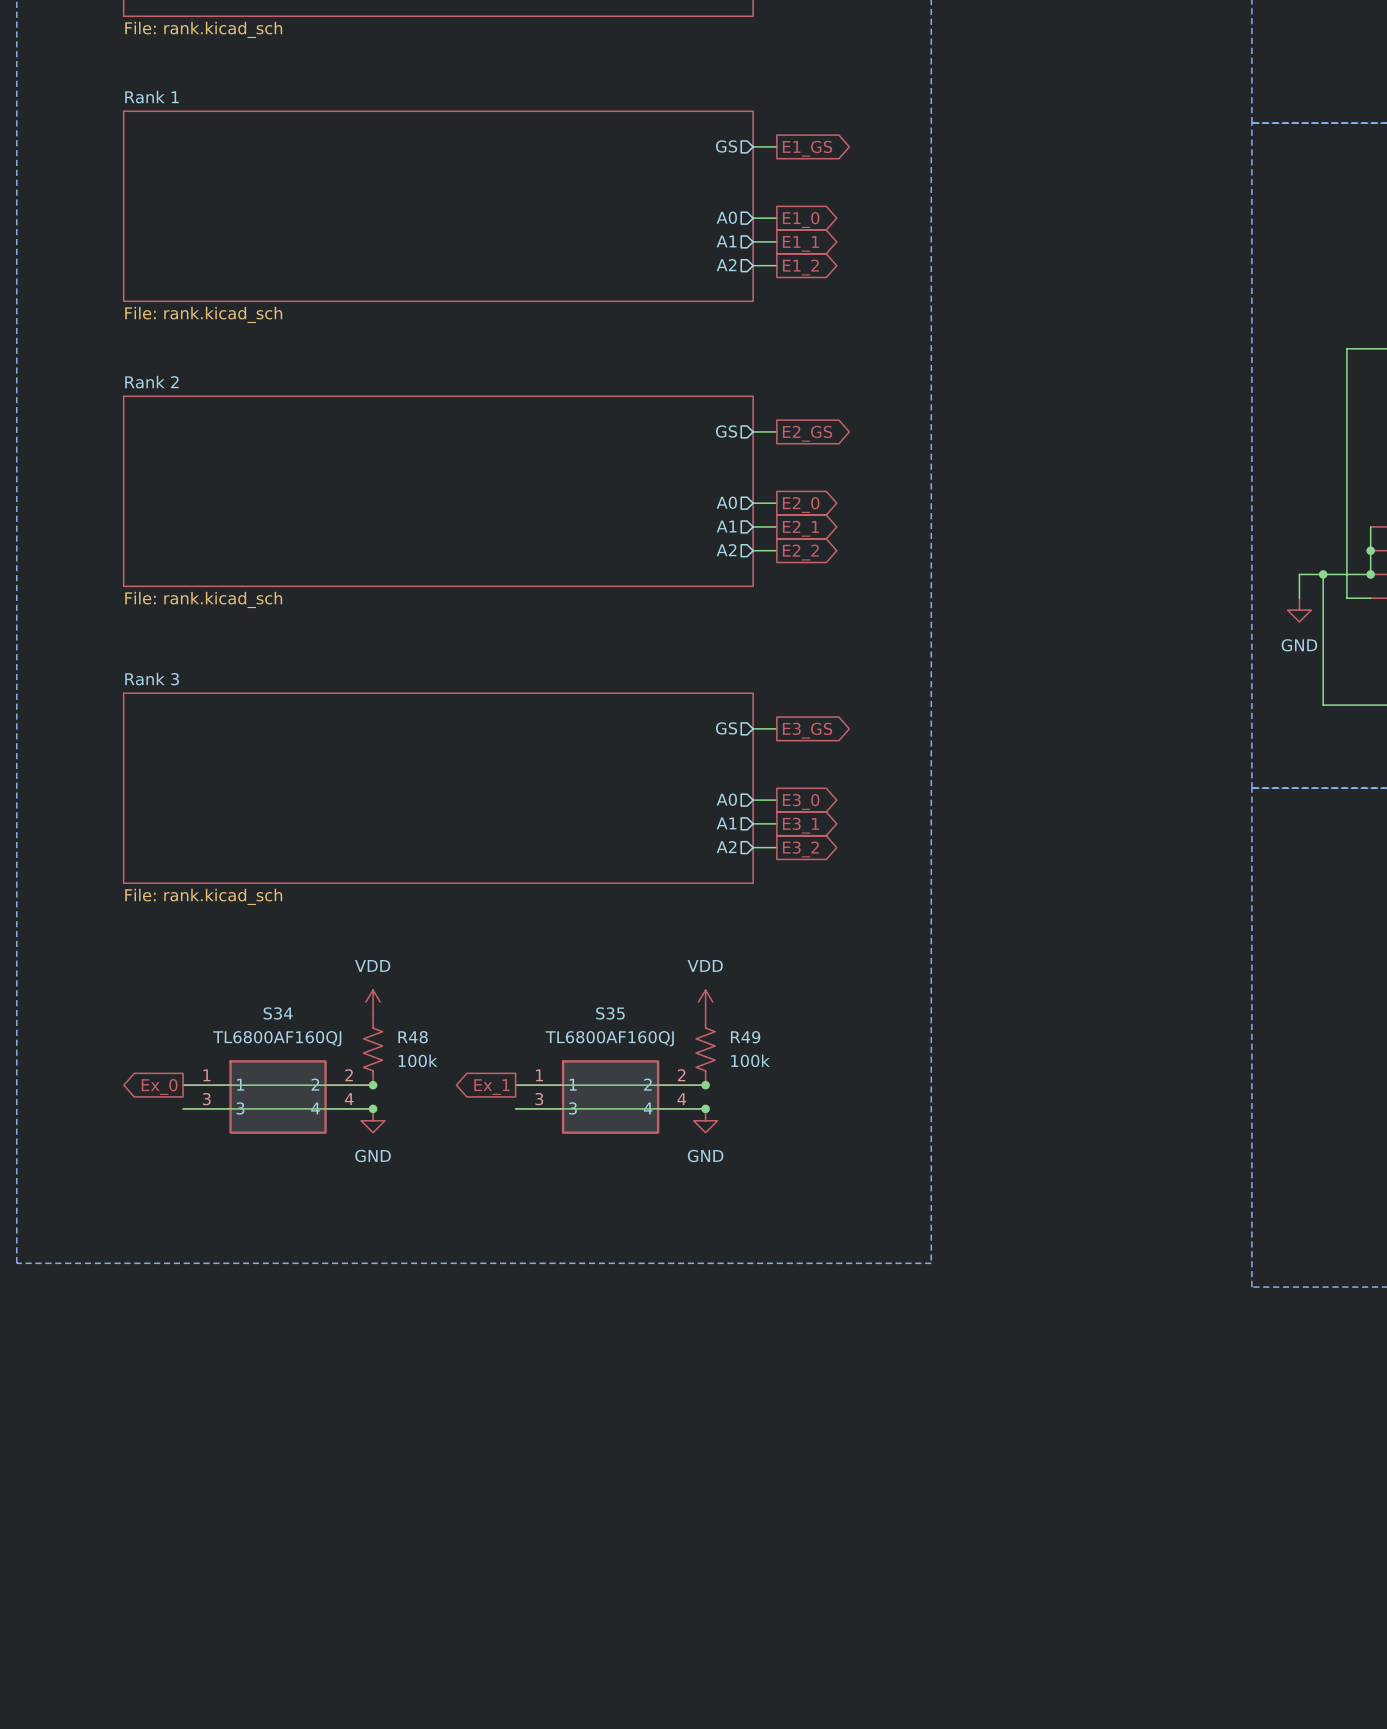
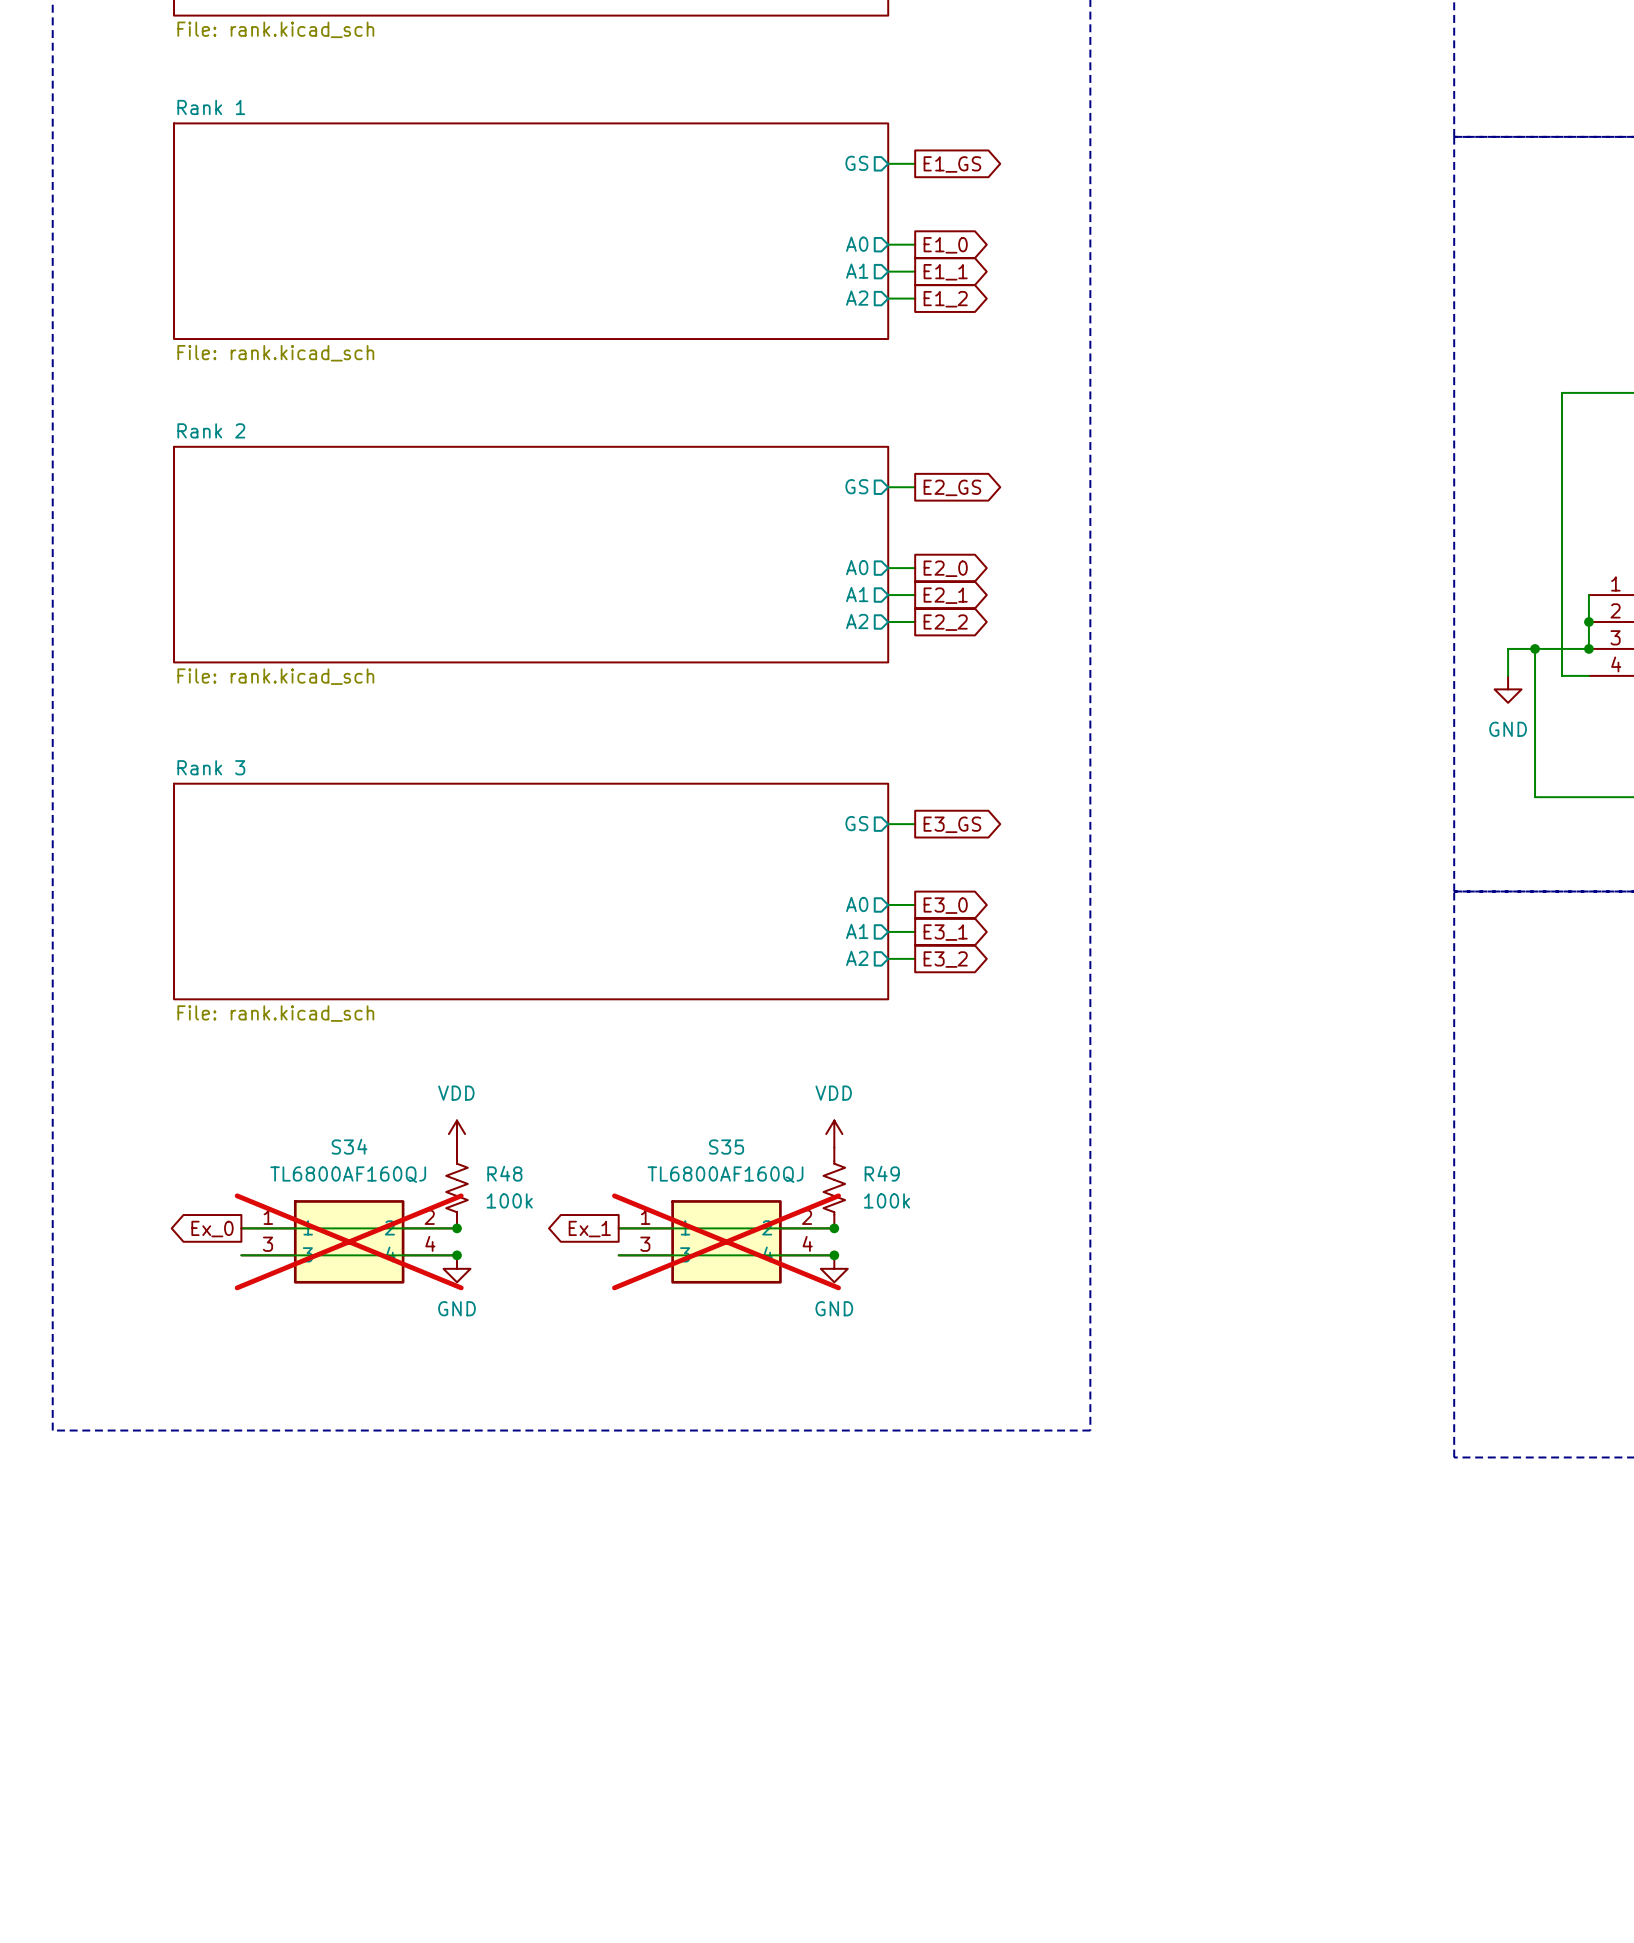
S34 do-not-place cross: none -> (349, 1241)
S35 do-not-place cross: none -> (726, 1241)

